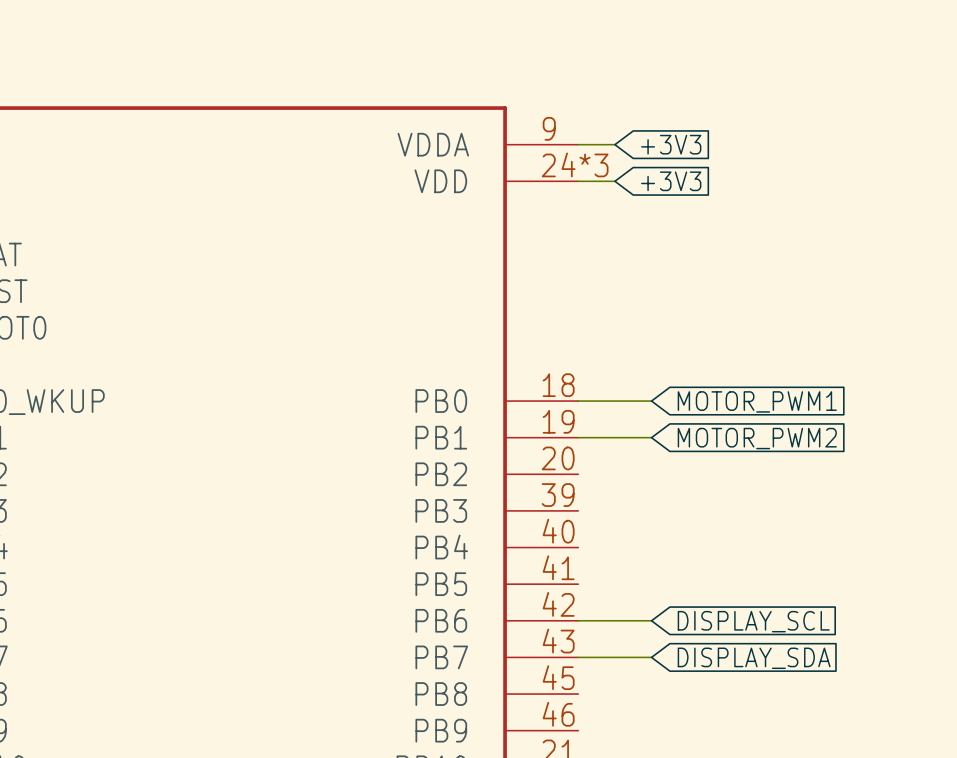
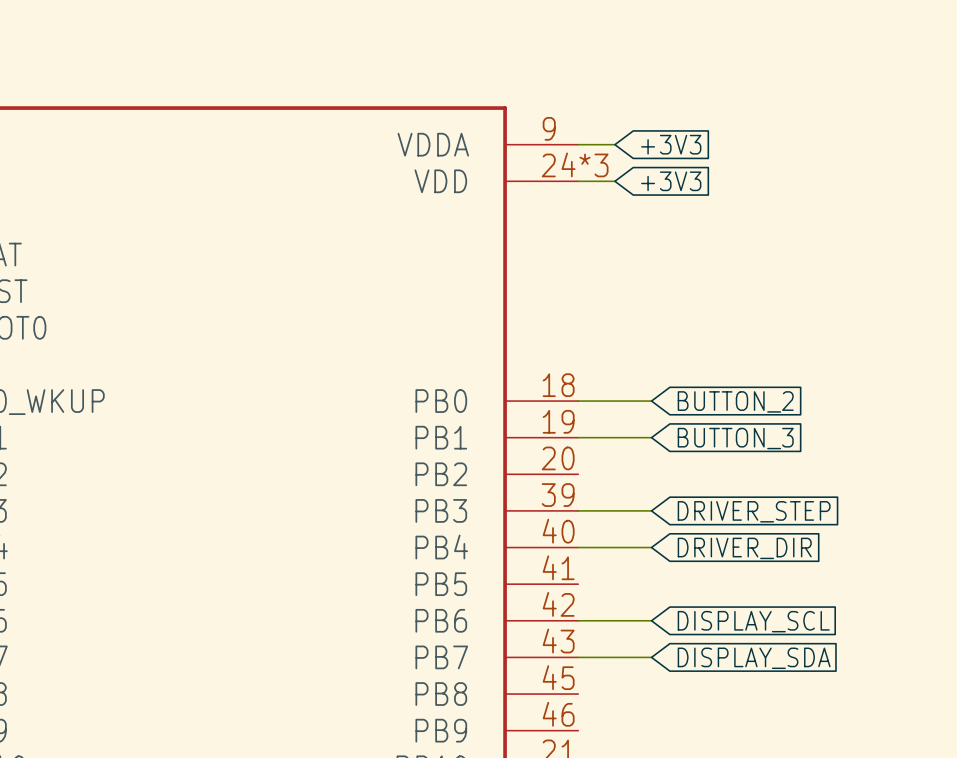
global label: MOTOR_PWM1 (757, 401) -> BUTTON_2 (735, 401)
global label: MOTOR_PWM2 (757, 438) -> BUTTON_3 (735, 438)
wire: none -> (578, 510) (651, 510)
global label: none -> DRIVER_STEP (754, 511)
wire: none -> (578, 547) (651, 547)
global label: none -> DRIVER_DIR (744, 548)

